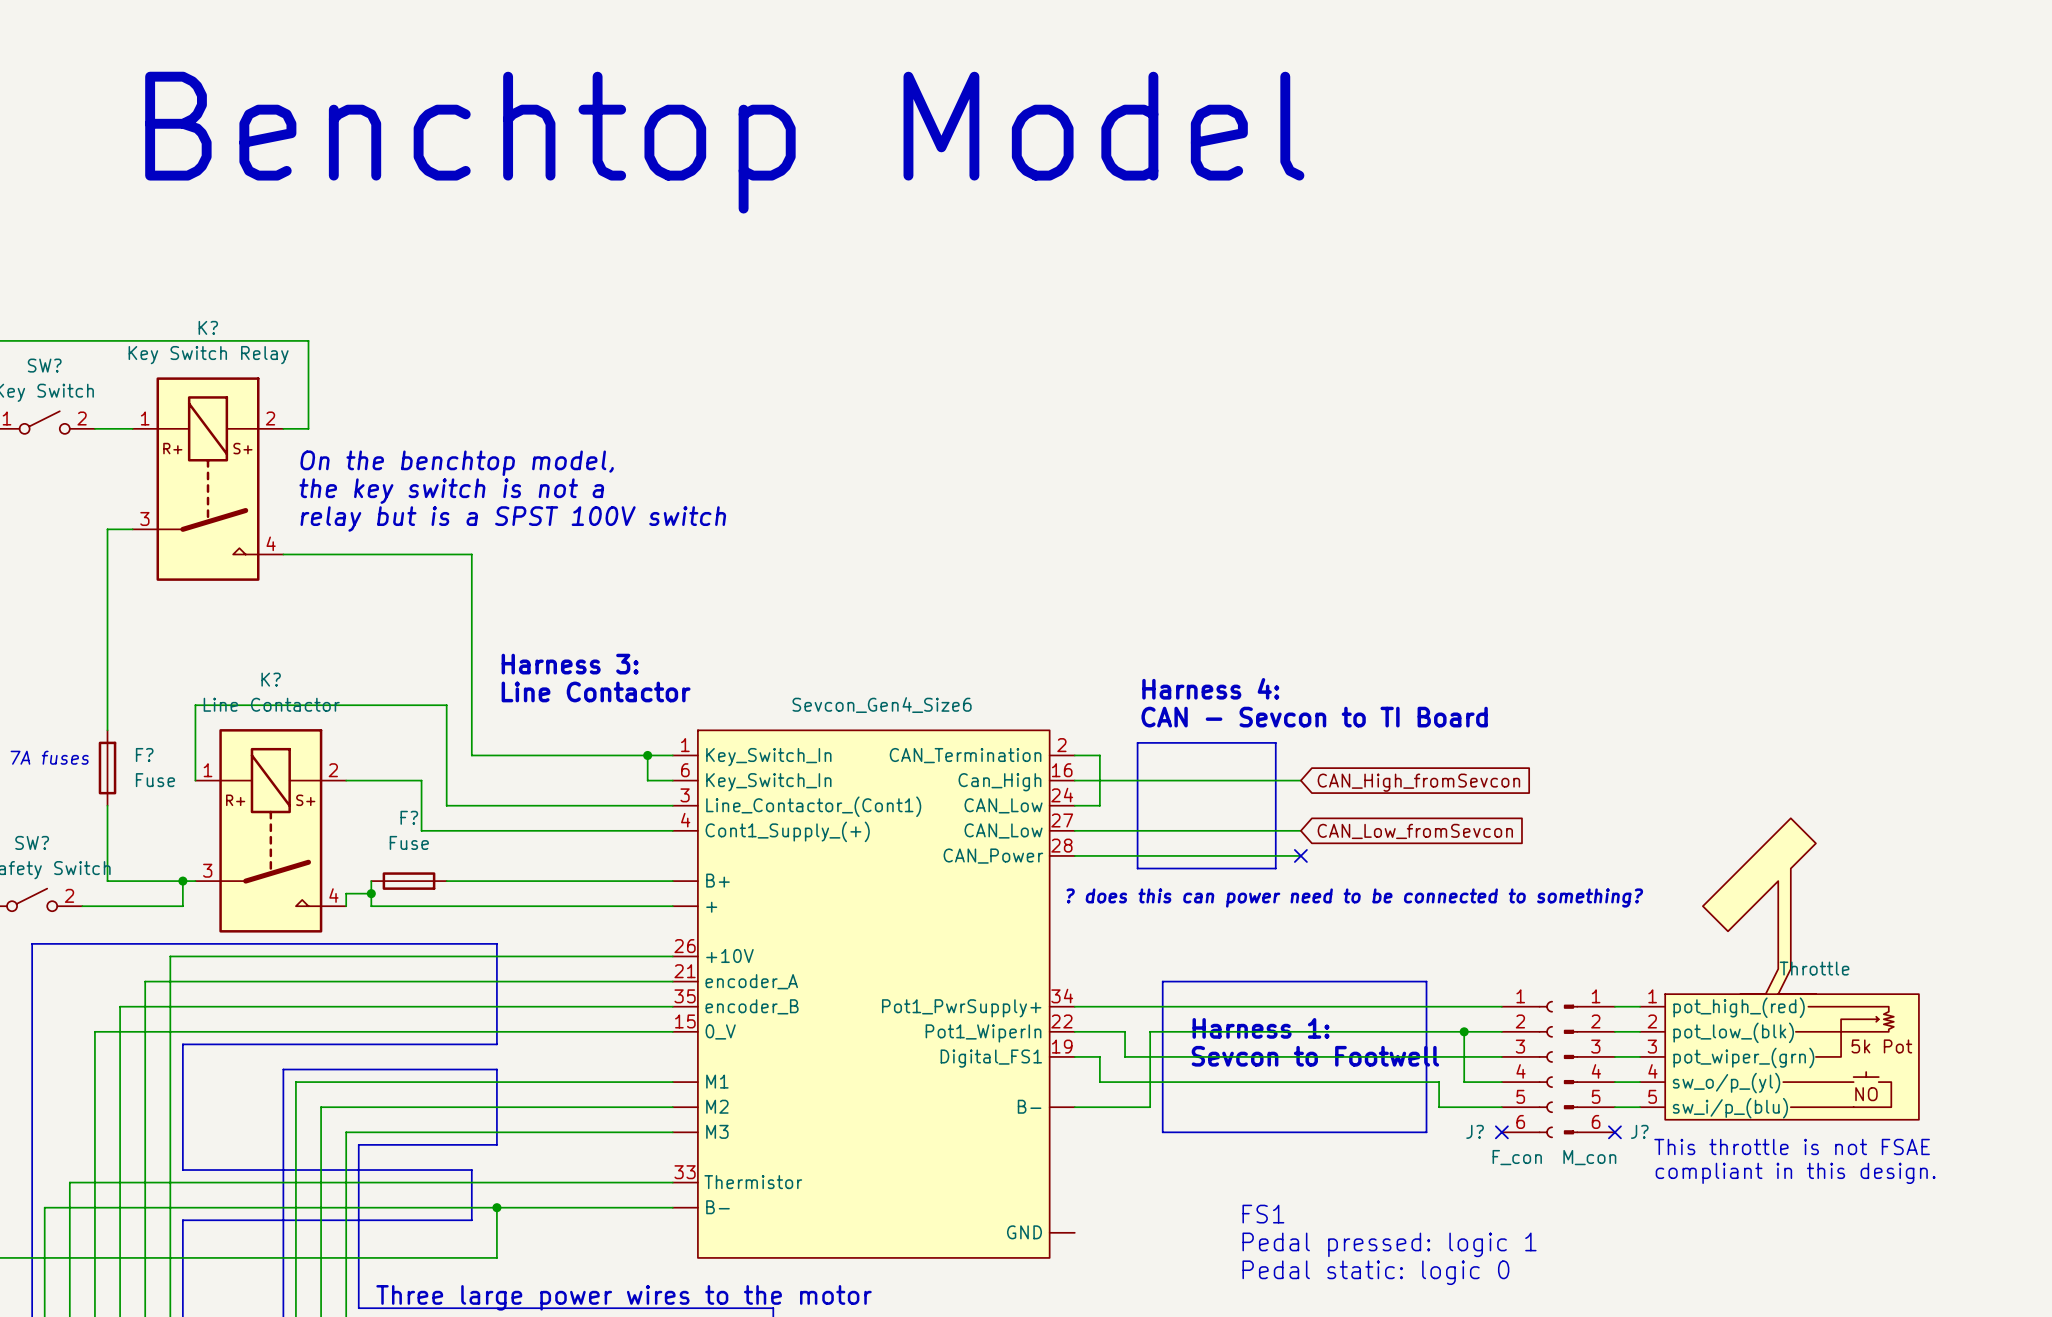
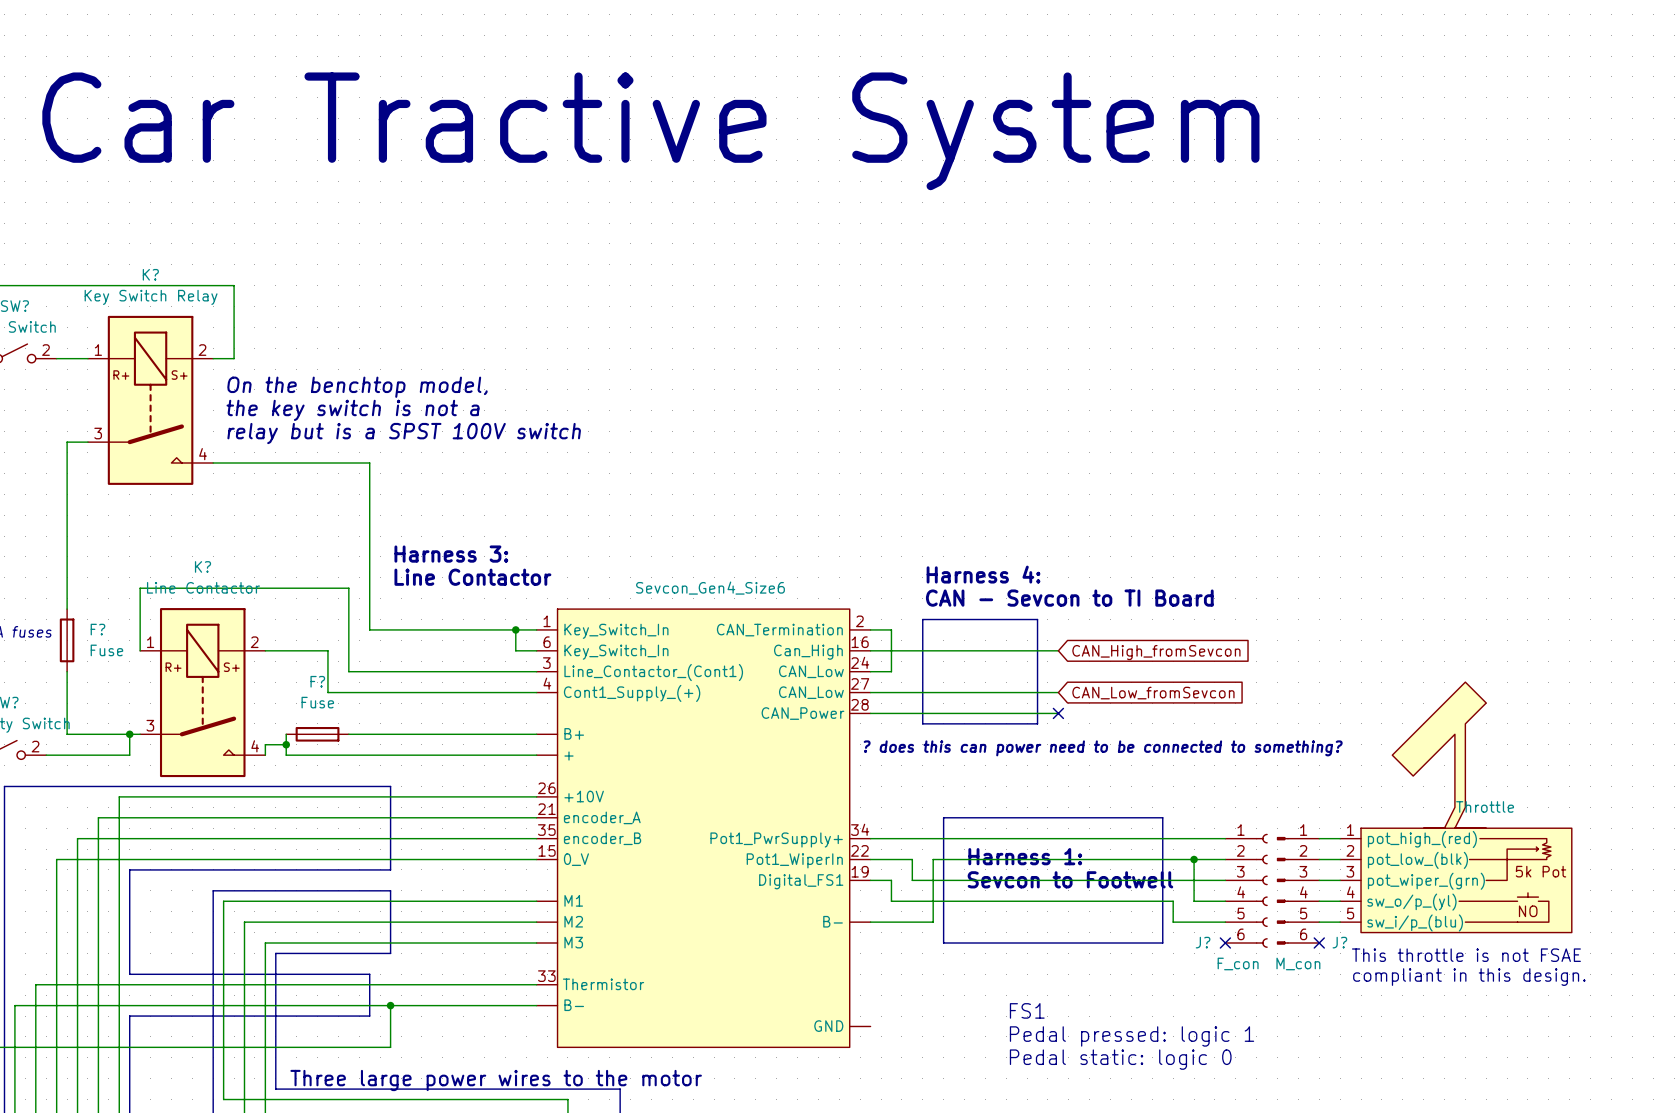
text: Benchtop Model (724, 142) -> none
text: none -> Car Tractive System (650, 131)

